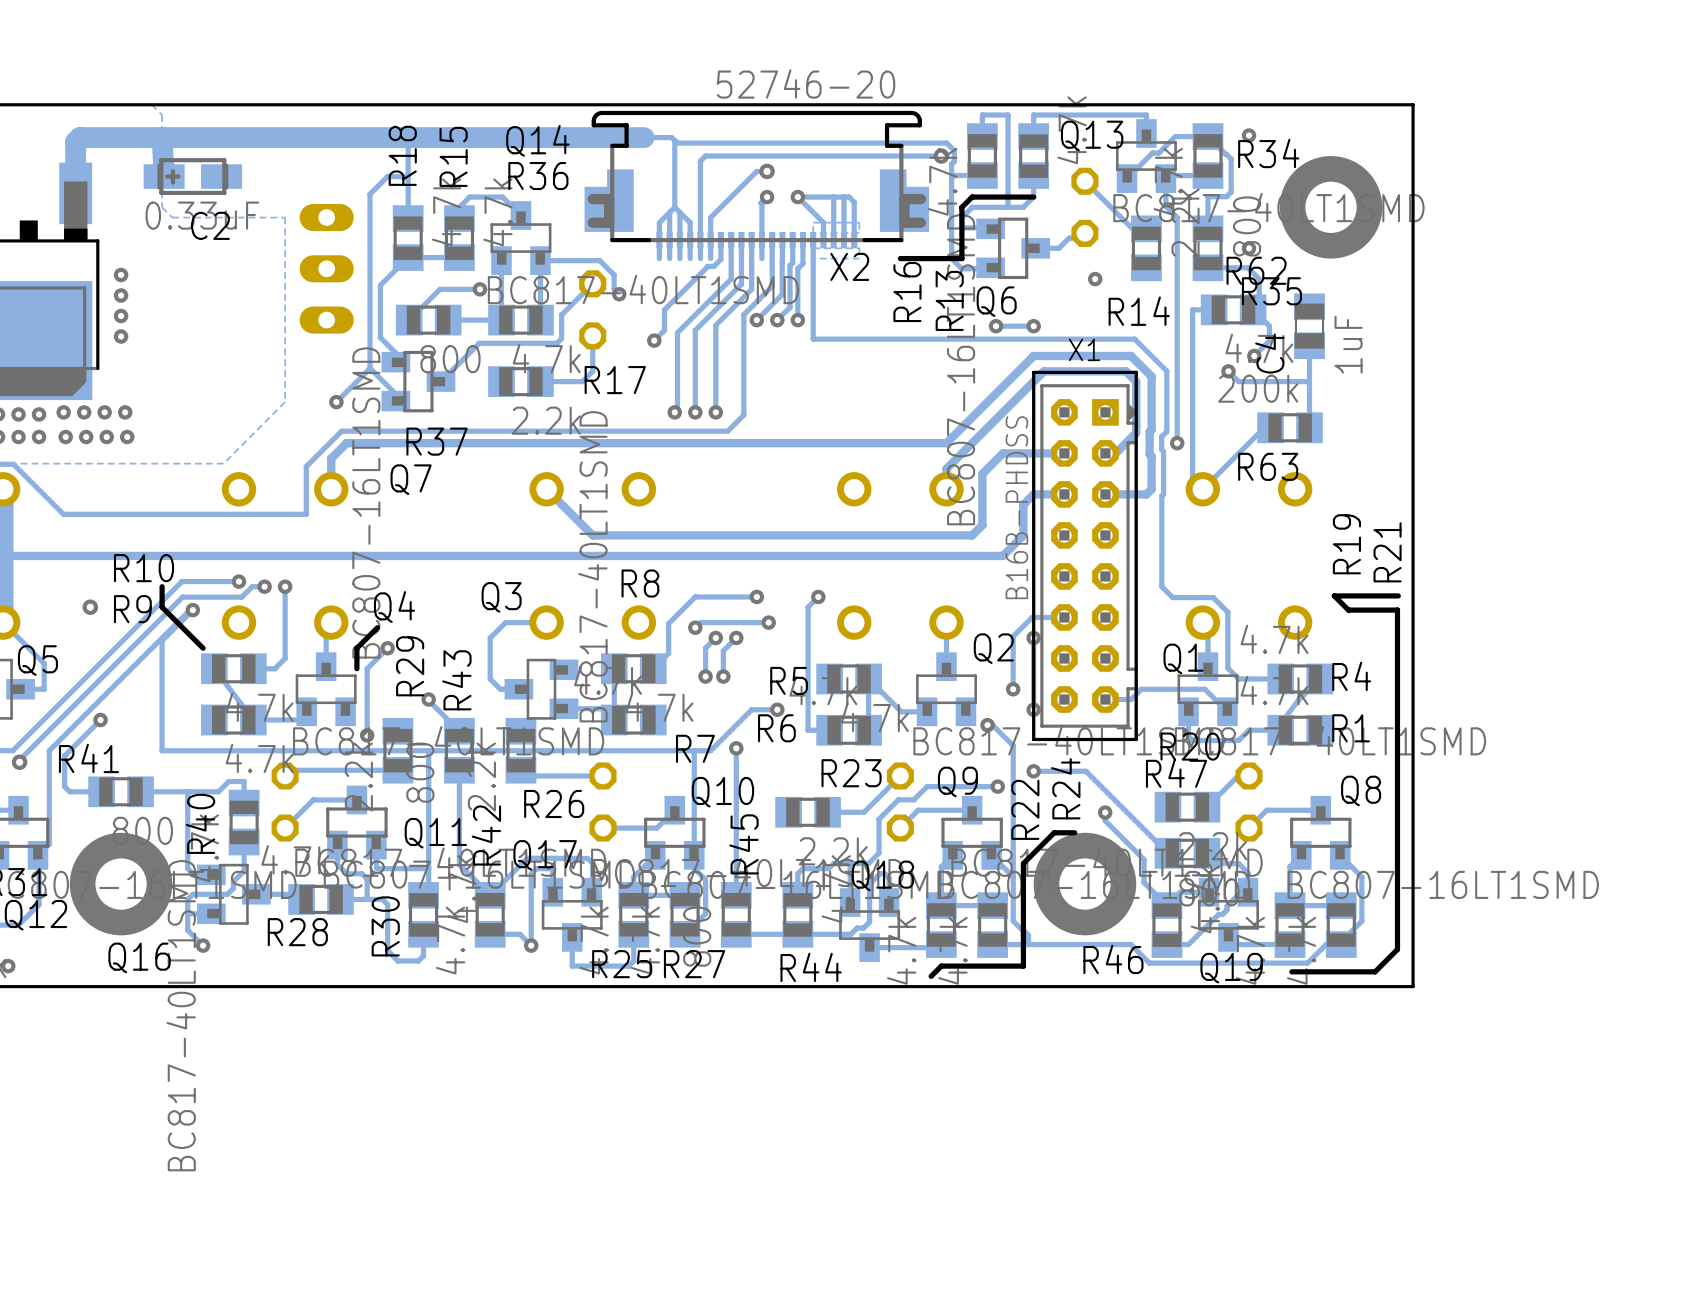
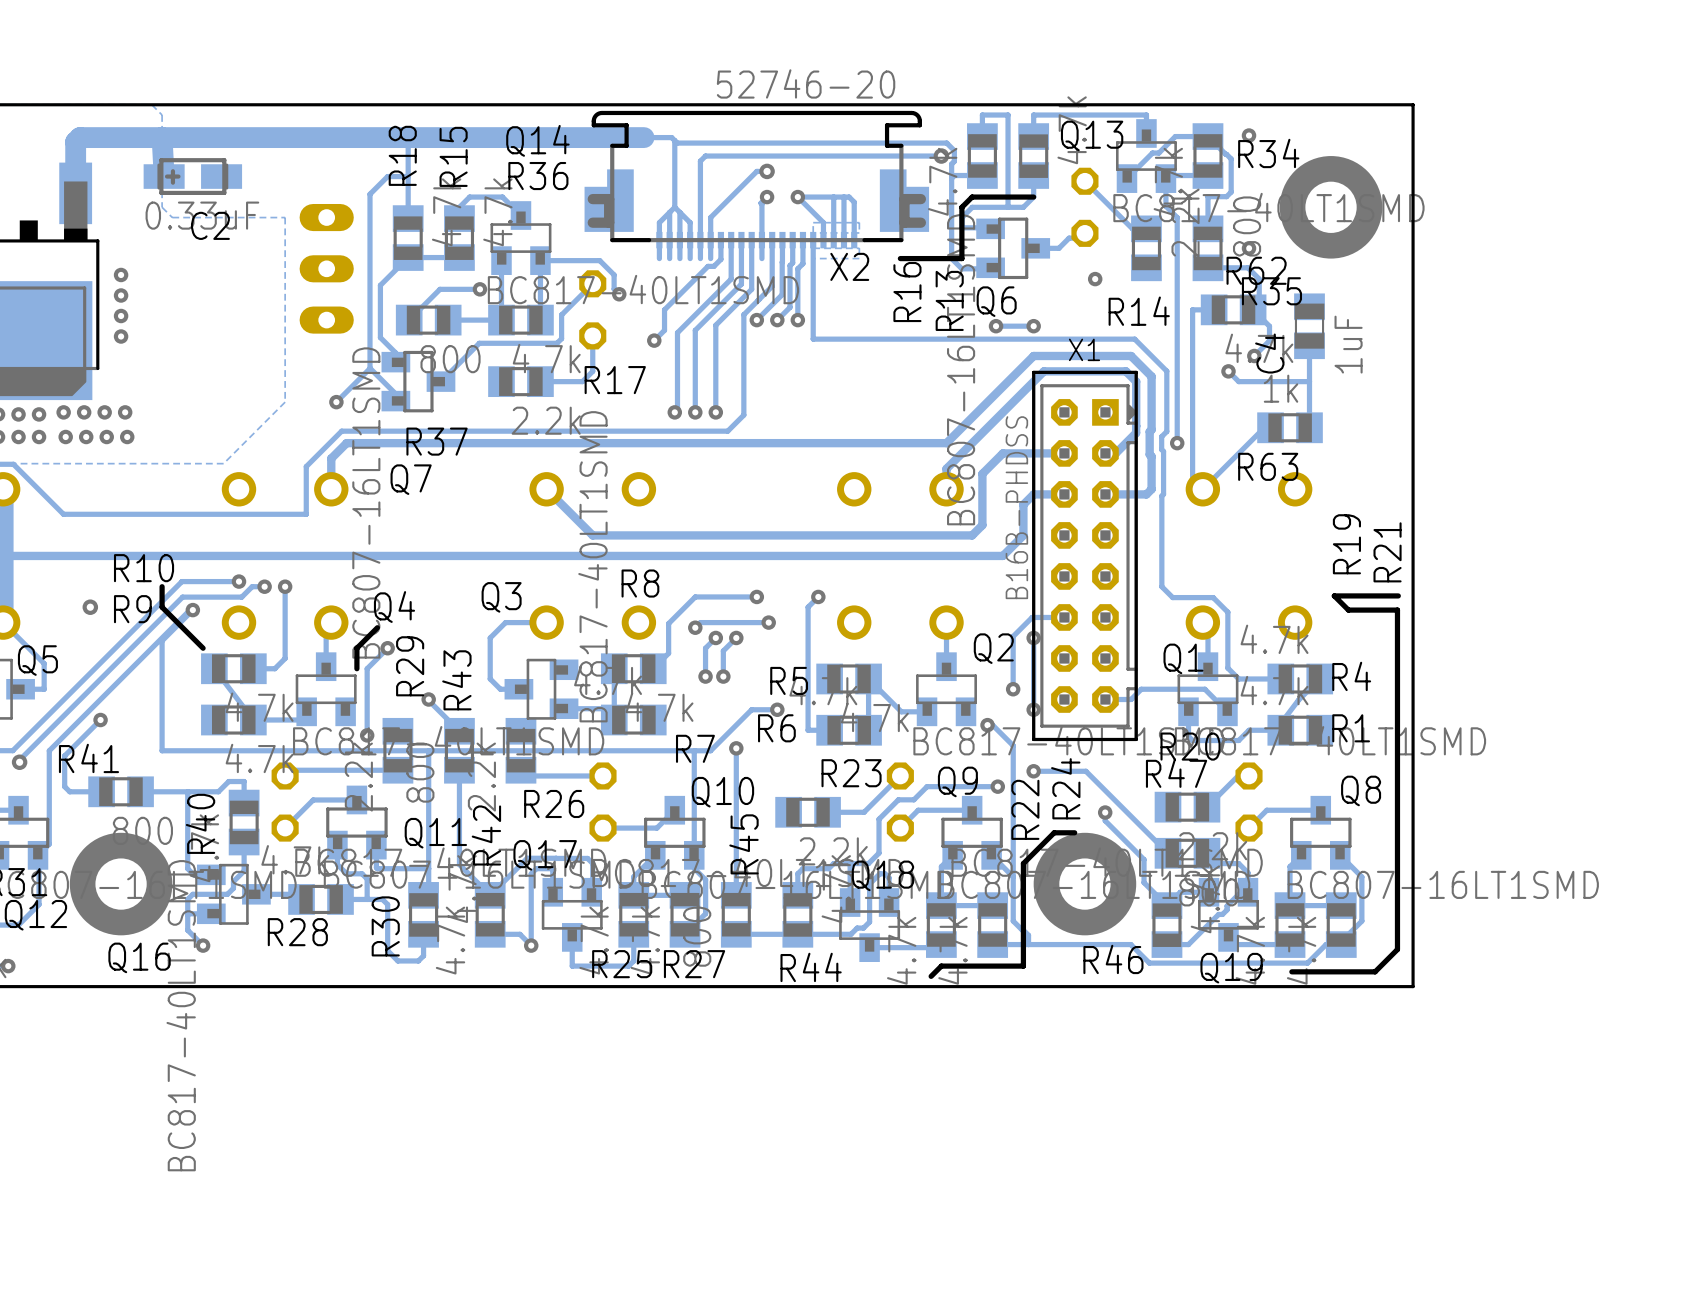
R63 value: 200k (1258, 388) -> 1k (1281, 388)

